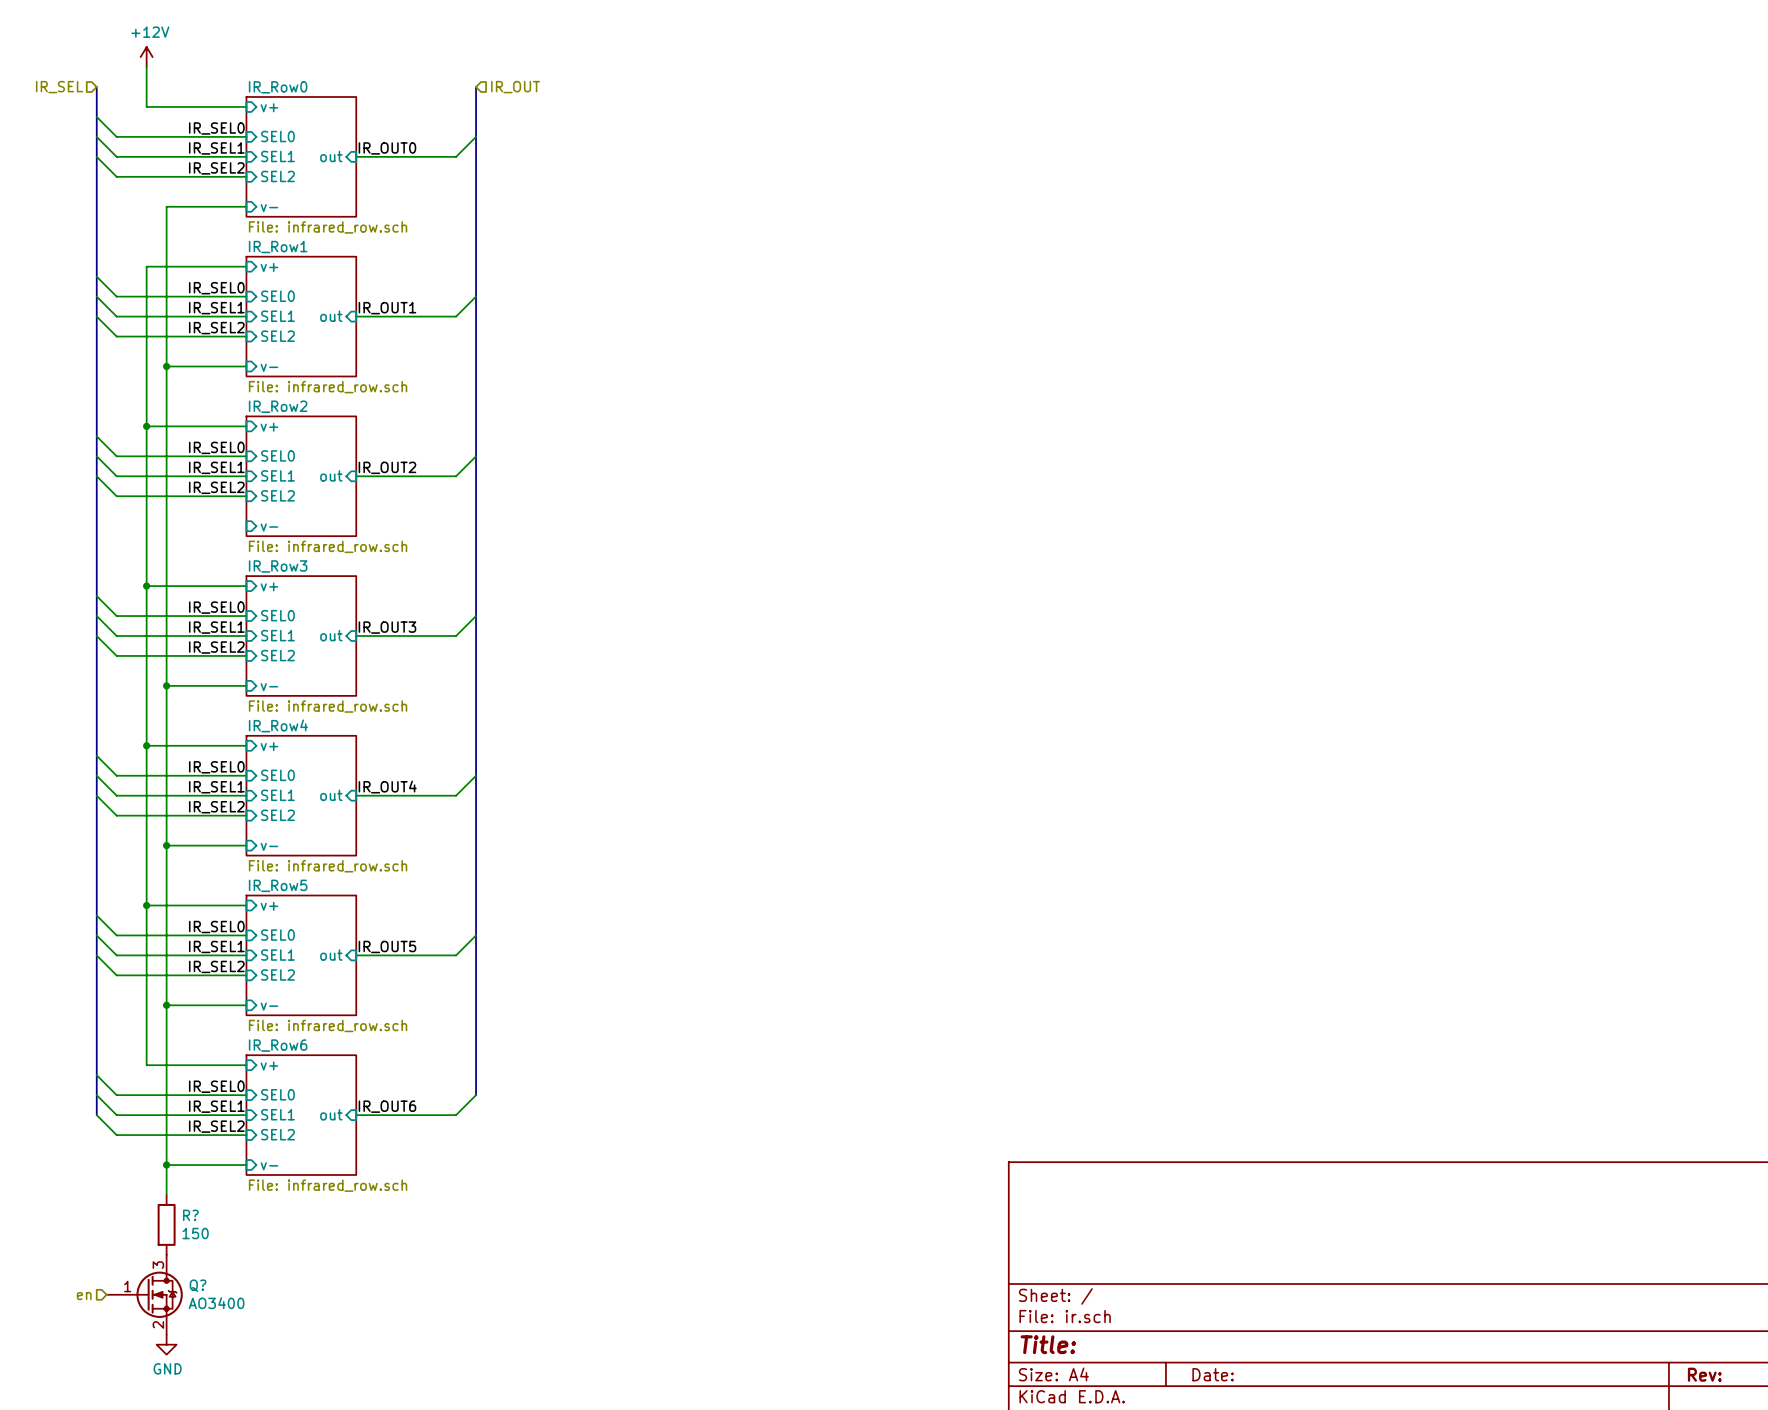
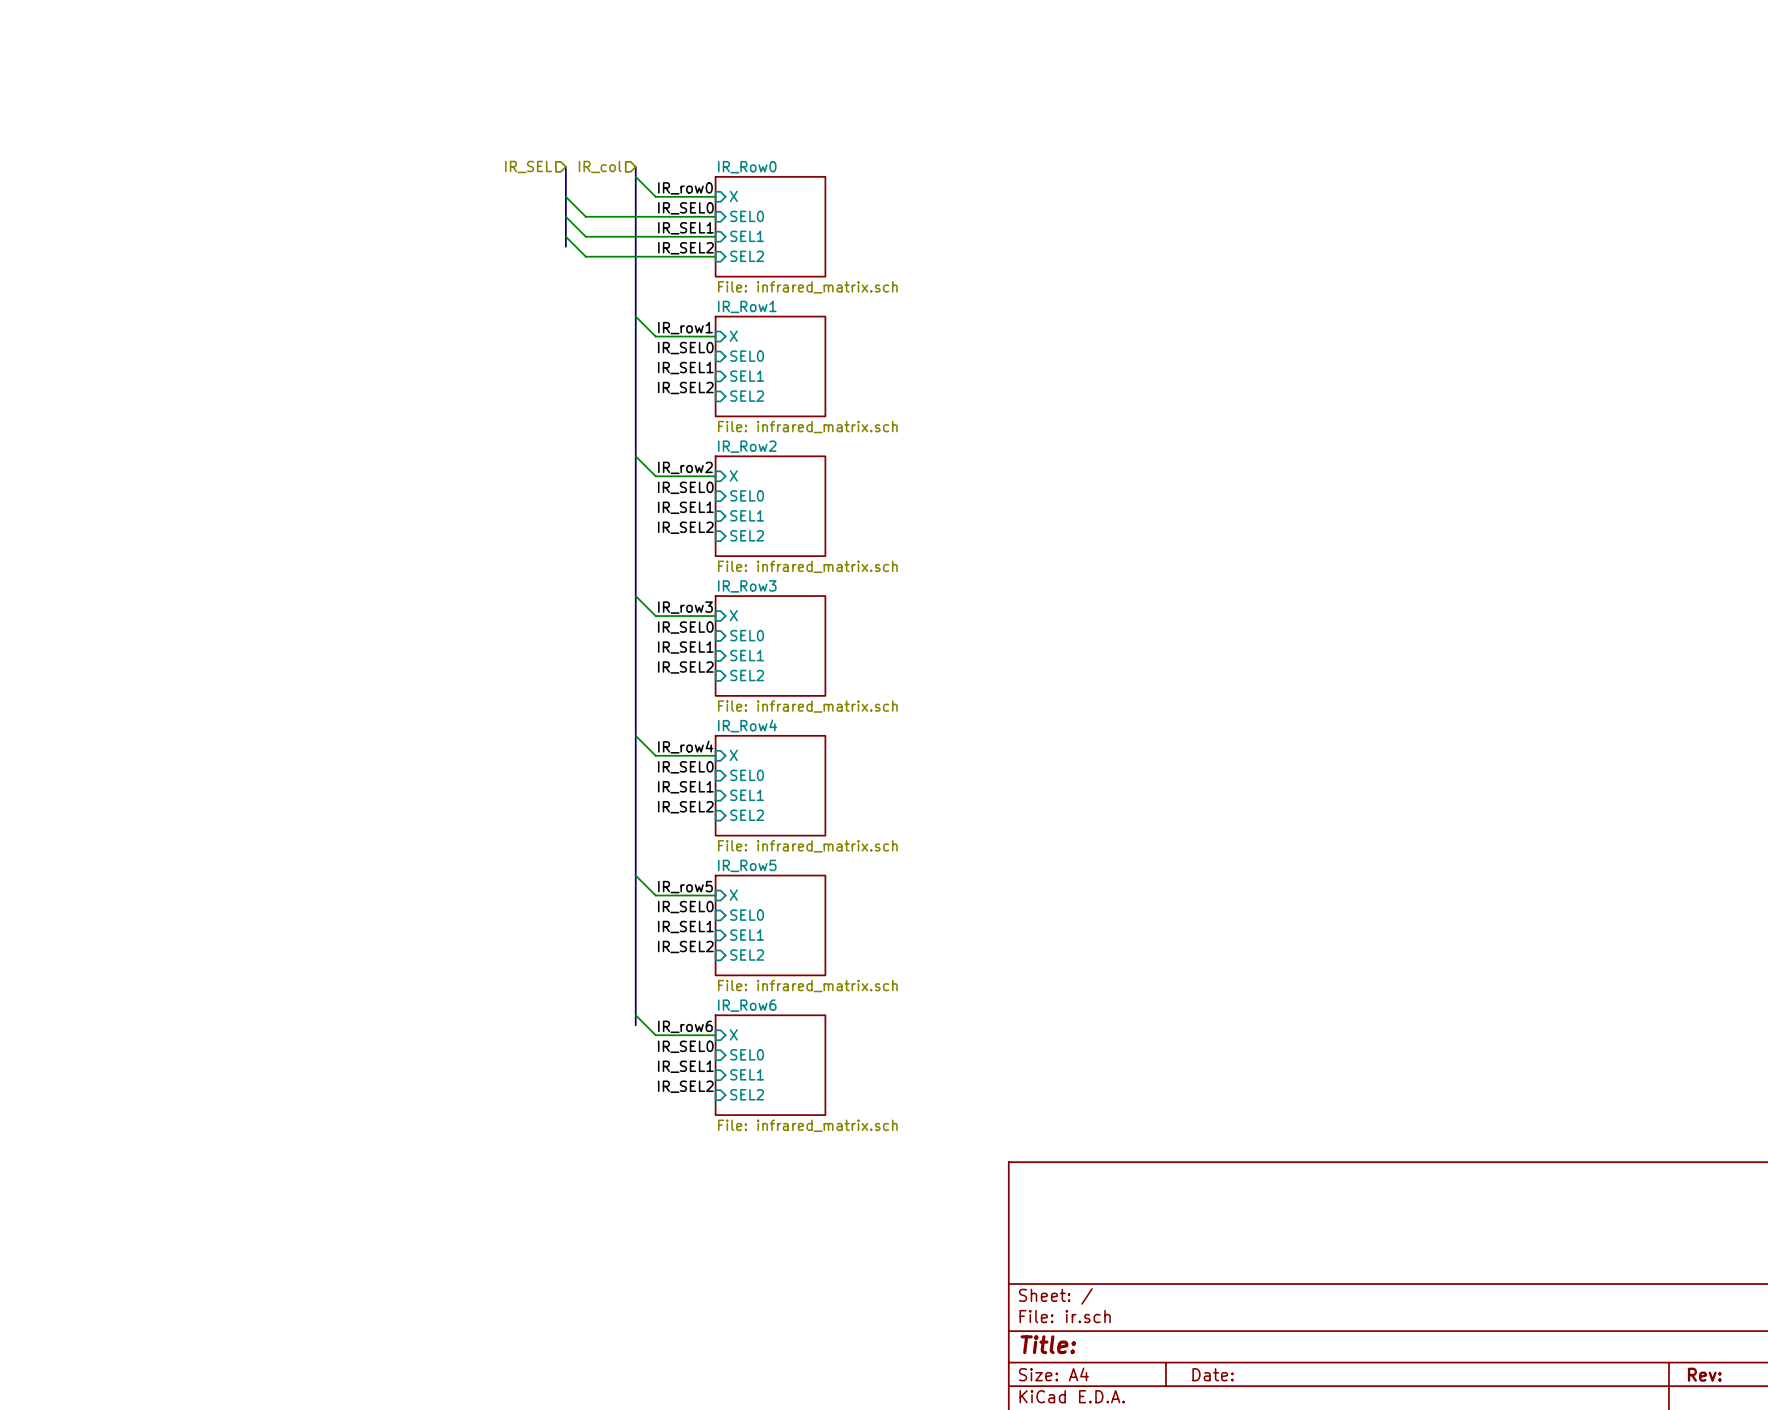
power symbol: +12V (146, 57) -> none
wire: (146, 67) (146, 106) (246, 106) -> none
hierarchical label: IR_SEL (59, 87) -> none
bus: (96, 87) (96, 1115) -> none
bus: (476, 87) (476, 1095) -> none
hierarchical label: IR_OUT (515, 87) -> none
sheet IR_Row0 shape: [246, 96, 357, 217] -> [715, 176, 826, 277]
sheet pin: v+ (269, 107) -> none
wire: (96, 116) (116, 136) (246, 136) -> none
label: IR_SEL0 (216, 128) -> none
wire: (96, 136) (116, 156) (246, 156) -> none
sheet pin: SEL0 (277, 136) -> none
wire: (476, 136) (456, 156) (356, 156) -> none
label: IR_SEL1 (216, 148) -> none
label: IR_OUT0 (387, 148) -> none
wire: (96, 156) (116, 176) (246, 176) -> none
sheet pin: SEL1 (277, 156) -> none
sheet pin: out (331, 156) -> none
hierarchical label: none -> IR_SEL (528, 166)
bus: none -> (565, 166) (565, 246)
hierarchical label: none -> IR_col (600, 166)
bus: none -> (635, 166) (635, 1025)
label: IR_SEL2 (216, 168) -> none
sheet pin: SEL2 (277, 176) -> none
wire: none -> (635, 176) (655, 196) (715, 196)
label: none -> IR_row0 (685, 188)
wire: none -> (565, 196) (585, 216) (715, 216)
sheet pin: none -> X (733, 196)
wire: (246, 206) (166, 206) (166, 1194) -> none
sheet pin: v- (269, 208) -> none
label: none -> IR_SEL0 (685, 208)
wire: none -> (565, 216) (585, 236) (715, 236)
sheet pin: none -> SEL0 (747, 216)
sheet IR_Row0 value: File: infrared_row.sch (328, 227) -> File: infrared_matrix.sch (807, 287)
label: none -> IR_SEL1 (685, 228)
wire: none -> (565, 236) (585, 256) (715, 256)
sheet pin: none -> SEL1 (747, 236)
label: none -> IR_SEL2 (685, 248)
sheet IR_Row1 shape: [246, 256, 357, 377] -> [715, 316, 826, 417]
sheet pin: none -> SEL2 (747, 256)
wire: (246, 266) (146, 266) (146, 1065) (246, 1065) -> none
sheet pin: v+ (269, 267) -> none
wire: (96, 276) (116, 296) (246, 296) -> none
label: IR_SEL0 (216, 288) -> none
wire: (96, 296) (116, 316) (246, 316) -> none
sheet pin: SEL0 (277, 296) -> none
wire: (476, 296) (456, 316) (356, 316) -> none
label: IR_SEL1 (216, 308) -> none
label: IR_OUT1 (387, 308) -> none
wire: (96, 316) (116, 336) (246, 336) -> none
sheet pin: SEL1 (277, 316) -> none
sheet pin: out (331, 316) -> none
wire: none -> (635, 316) (655, 336) (715, 336)
label: IR_SEL2 (216, 328) -> none
label: none -> IR_row1 (685, 328)
sheet pin: SEL2 (277, 336) -> none
sheet pin: none -> X (733, 336)
label: none -> IR_SEL0 (685, 348)
sheet pin: none -> SEL0 (747, 356)
wire: (166, 366) (246, 366) -> none
junction: (166, 366) -> none
sheet pin: v- (269, 367) -> none
label: none -> IR_SEL1 (685, 368)
sheet pin: none -> SEL1 (747, 376)
sheet IR_Row1 value: File: infrared_row.sch (328, 387) -> File: infrared_matrix.sch (807, 427)
label: none -> IR_SEL2 (685, 388)
sheet pin: none -> SEL2 (747, 396)
sheet IR_Row2 shape: [246, 416, 357, 537] -> [715, 456, 826, 557]
wire: (146, 426) (246, 426) -> none
junction: (146, 426) -> none
sheet pin: v+ (269, 427) -> none
wire: (96, 436) (116, 456) (246, 456) -> none
label: IR_SEL0 (216, 447) -> none
sheet pin: SEL0 (277, 455) -> none
wire: (96, 456) (116, 476) (246, 476) -> none
wire: (476, 456) (456, 476) (356, 476) -> none
wire: none -> (635, 456) (655, 476) (715, 476)
label: IR_SEL1 (216, 467) -> none
label: IR_OUT2 (387, 467) -> none
label: none -> IR_row2 (685, 467)
sheet pin: SEL1 (277, 475) -> none
sheet pin: out (331, 475) -> none
sheet pin: none -> X (733, 475)
wire: (96, 476) (116, 496) (246, 496) -> none
label: IR_SEL2 (216, 487) -> none
label: none -> IR_SEL0 (685, 487)
sheet pin: SEL2 (277, 495) -> none
sheet pin: none -> SEL0 (747, 495)
label: none -> IR_SEL1 (685, 507)
sheet pin: none -> SEL1 (747, 515)
sheet pin: v- (269, 527) -> none
label: none -> IR_SEL2 (685, 527)
sheet pin: none -> SEL2 (747, 535)
sheet IR_Row2 value: File: infrared_row.sch (328, 546) -> File: infrared_matrix.sch (807, 566)
sheet IR_Row3 shape: [246, 576, 357, 696] -> [715, 596, 826, 696]
wire: (146, 586) (246, 586) -> none
junction: (146, 586) -> none
sheet pin: v+ (269, 586) -> none
wire: (96, 596) (116, 616) (246, 616) -> none
wire: none -> (635, 596) (655, 616) (715, 616)
label: IR_SEL0 (216, 607) -> none
label: none -> IR_row3 (685, 607)
sheet pin: SEL0 (277, 615) -> none
sheet pin: none -> X (733, 615)
wire: (96, 616) (116, 635) (246, 635) -> none
wire: (476, 616) (456, 635) (356, 635) -> none
label: IR_SEL1 (216, 627) -> none
label: IR_OUT3 (387, 627) -> none
label: none -> IR_SEL0 (685, 627)
wire: (96, 635) (116, 655) (246, 655) -> none
sheet pin: SEL1 (277, 635) -> none
sheet pin: out (331, 635) -> none
sheet pin: none -> SEL0 (747, 635)
label: IR_SEL2 (216, 647) -> none
label: none -> IR_SEL1 (685, 647)
sheet pin: SEL2 (277, 655) -> none
sheet pin: none -> SEL1 (747, 655)
label: none -> IR_SEL2 (685, 667)
sheet pin: none -> SEL2 (747, 675)
wire: (166, 685) (246, 685) -> none
junction: (166, 685) -> none
sheet pin: v- (269, 687) -> none
sheet IR_Row3 value: File: infrared_row.sch (328, 706) -> File: infrared_matrix.sch (807, 706)
sheet IR_Row4 shape: [246, 735, 357, 856] -> [715, 735, 826, 836]
wire: none -> (635, 735) (655, 755) (715, 755)
wire: (146, 745) (246, 745) -> none
junction: (146, 745) -> none
sheet pin: v+ (269, 746) -> none
label: none -> IR_row4 (685, 747)
wire: (96, 755) (116, 775) (246, 775) -> none
sheet pin: none -> X (733, 755)
label: IR_SEL0 (216, 767) -> none
label: none -> IR_SEL0 (685, 767)
wire: (96, 775) (116, 795) (246, 795) -> none
sheet pin: SEL0 (277, 775) -> none
wire: (476, 775) (456, 795) (356, 795) -> none
sheet pin: none -> SEL0 (747, 775)
label: IR_SEL1 (216, 787) -> none
label: IR_OUT4 (387, 787) -> none
label: none -> IR_SEL1 (685, 787)
wire: (96, 795) (116, 815) (246, 815) -> none
sheet pin: SEL1 (277, 795) -> none
sheet pin: out (331, 795) -> none
sheet pin: none -> SEL1 (747, 795)
label: IR_SEL2 (216, 807) -> none
label: none -> IR_SEL2 (685, 807)
sheet pin: SEL2 (277, 815) -> none
sheet pin: none -> SEL2 (747, 815)
wire: (166, 845) (246, 845) -> none
junction: (166, 845) -> none
sheet pin: v- (269, 846) -> none
sheet IR_Row4 value: File: infrared_row.sch (328, 866) -> File: infrared_matrix.sch (807, 846)
wire: none -> (635, 875) (655, 895) (715, 895)
label: none -> IR_row5 (685, 887)
sheet IR_Row5 shape: [246, 895, 357, 1016] -> [715, 875, 826, 976]
sheet pin: none -> X (733, 895)
wire: (146, 905) (246, 905) -> none
junction: (146, 905) -> none
sheet pin: v+ (269, 906) -> none
label: none -> IR_SEL0 (685, 907)
wire: (96, 915) (116, 935) (246, 935) -> none
sheet pin: none -> SEL0 (747, 915)
label: IR_SEL0 (216, 927) -> none
label: none -> IR_SEL1 (685, 927)
wire: (96, 935) (116, 955) (246, 955) -> none
sheet pin: SEL0 (277, 935) -> none
wire: (476, 935) (456, 955) (356, 955) -> none
sheet pin: none -> SEL1 (747, 935)
label: IR_SEL1 (216, 946) -> none
label: IR_OUT5 (387, 946) -> none
label: none -> IR_SEL2 (685, 946)
wire: (96, 955) (116, 975) (246, 975) -> none
sheet pin: SEL1 (277, 955) -> none
sheet pin: out (331, 955) -> none
sheet pin: none -> SEL2 (747, 955)
label: IR_SEL2 (216, 966) -> none
sheet pin: SEL2 (277, 974) -> none
wire: (166, 1005) (246, 1005) -> none
junction: (166, 1005) -> none
sheet pin: v- (269, 1006) -> none
wire: none -> (635, 1015) (655, 1035) (715, 1035)
sheet IR_Row5 value: File: infrared_row.sch (328, 1025) -> File: infrared_matrix.sch (807, 986)
label: none -> IR_row6 (685, 1026)
sheet pin: none -> X (733, 1034)
label: none -> IR_SEL0 (685, 1046)
sheet pin: none -> SEL0 (747, 1054)
sheet IR_Row6 shape: [246, 1055, 357, 1176] -> [715, 1015, 826, 1116]
sheet pin: v+ (269, 1066) -> none
label: none -> IR_SEL1 (685, 1066)
sheet pin: none -> SEL1 (747, 1074)
wire: (96, 1075) (116, 1095) (246, 1095) -> none
label: IR_SEL0 (216, 1086) -> none
label: none -> IR_SEL2 (685, 1086)
sheet pin: SEL0 (277, 1094) -> none
sheet pin: none -> SEL2 (747, 1094)
wire: (96, 1095) (116, 1115) (246, 1115) -> none
wire: (476, 1095) (456, 1115) (356, 1115) -> none
label: IR_SEL1 (216, 1106) -> none
label: IR_OUT6 (387, 1106) -> none
sheet pin: SEL1 (277, 1114) -> none
sheet pin: out (331, 1114) -> none
wire: (96, 1115) (116, 1135) (246, 1135) -> none
label: IR_SEL2 (216, 1126) -> none
sheet pin: SEL2 (277, 1134) -> none
wire: (166, 1165) (246, 1165) -> none
junction: (166, 1165) -> none
sheet pin: v- (269, 1166) -> none
sheet IR_Row6 value: File: infrared_row.sch (328, 1185) -> File: infrared_matrix.sch (807, 1125)
R?: 150 (166, 1224) -> none
Q?: AO3400 (144, 1294) -> none
hierarchical label: en (84, 1296) -> none
power symbol: GND (166, 1344) -> none

